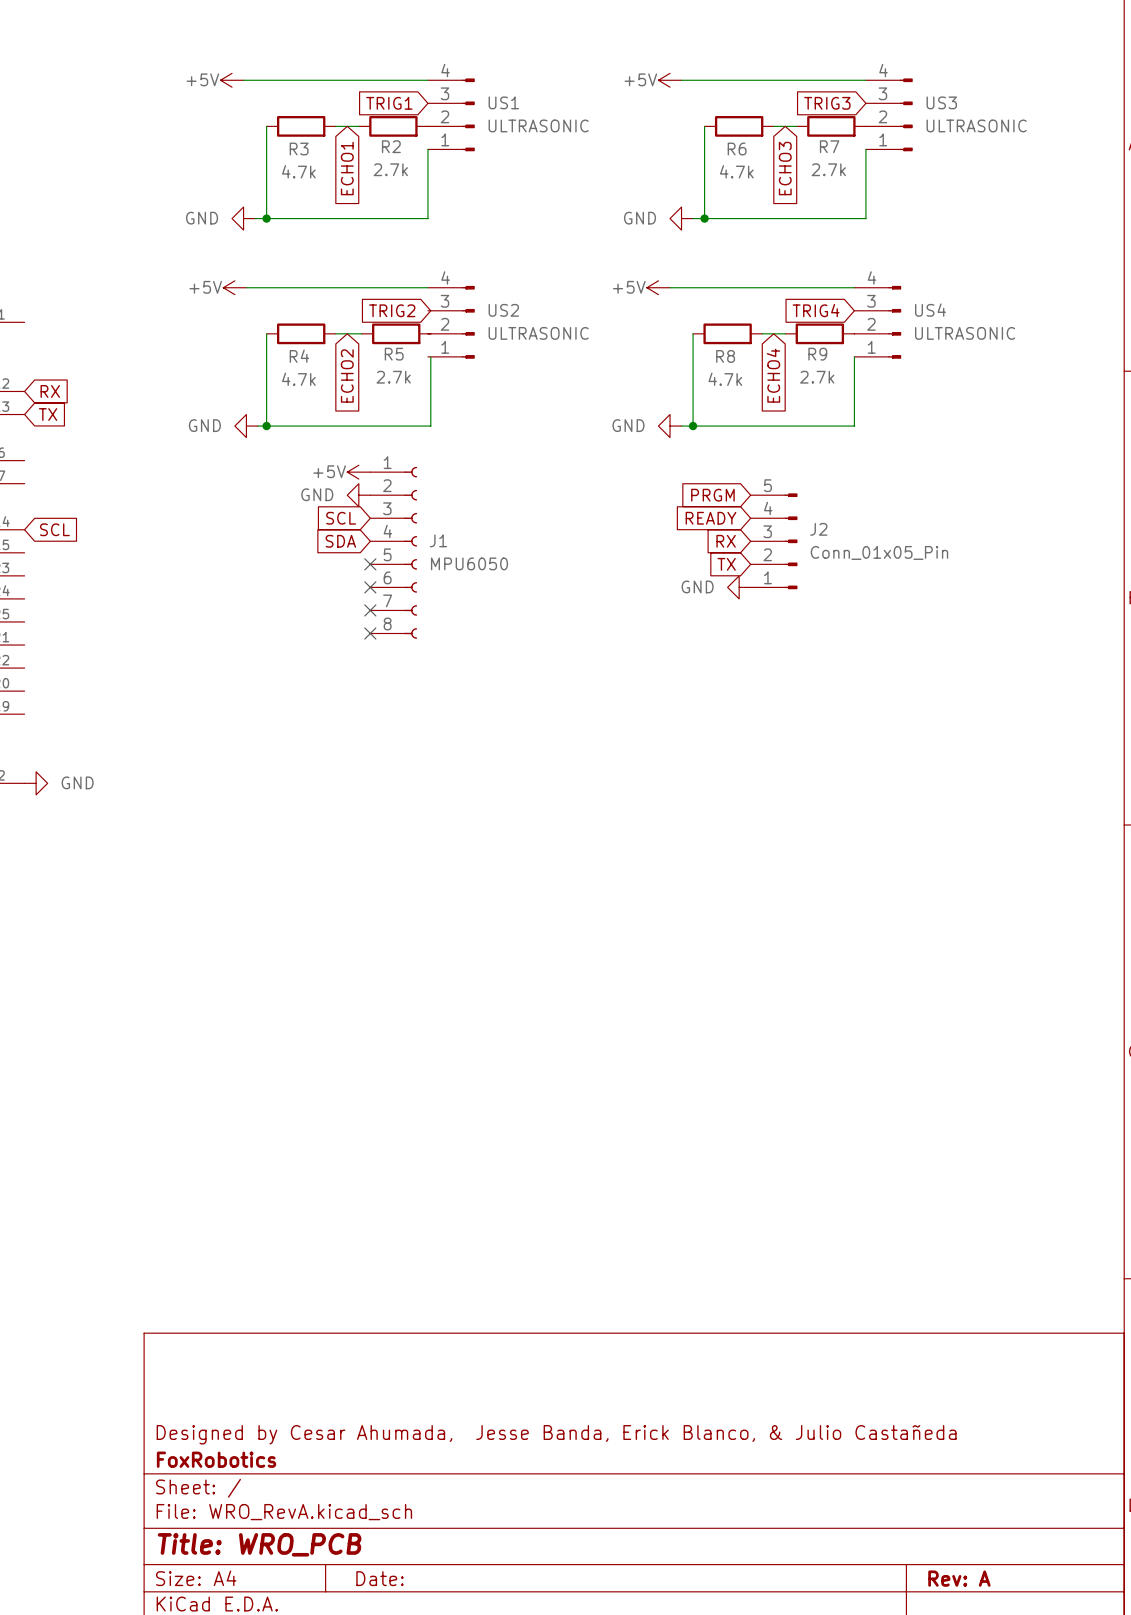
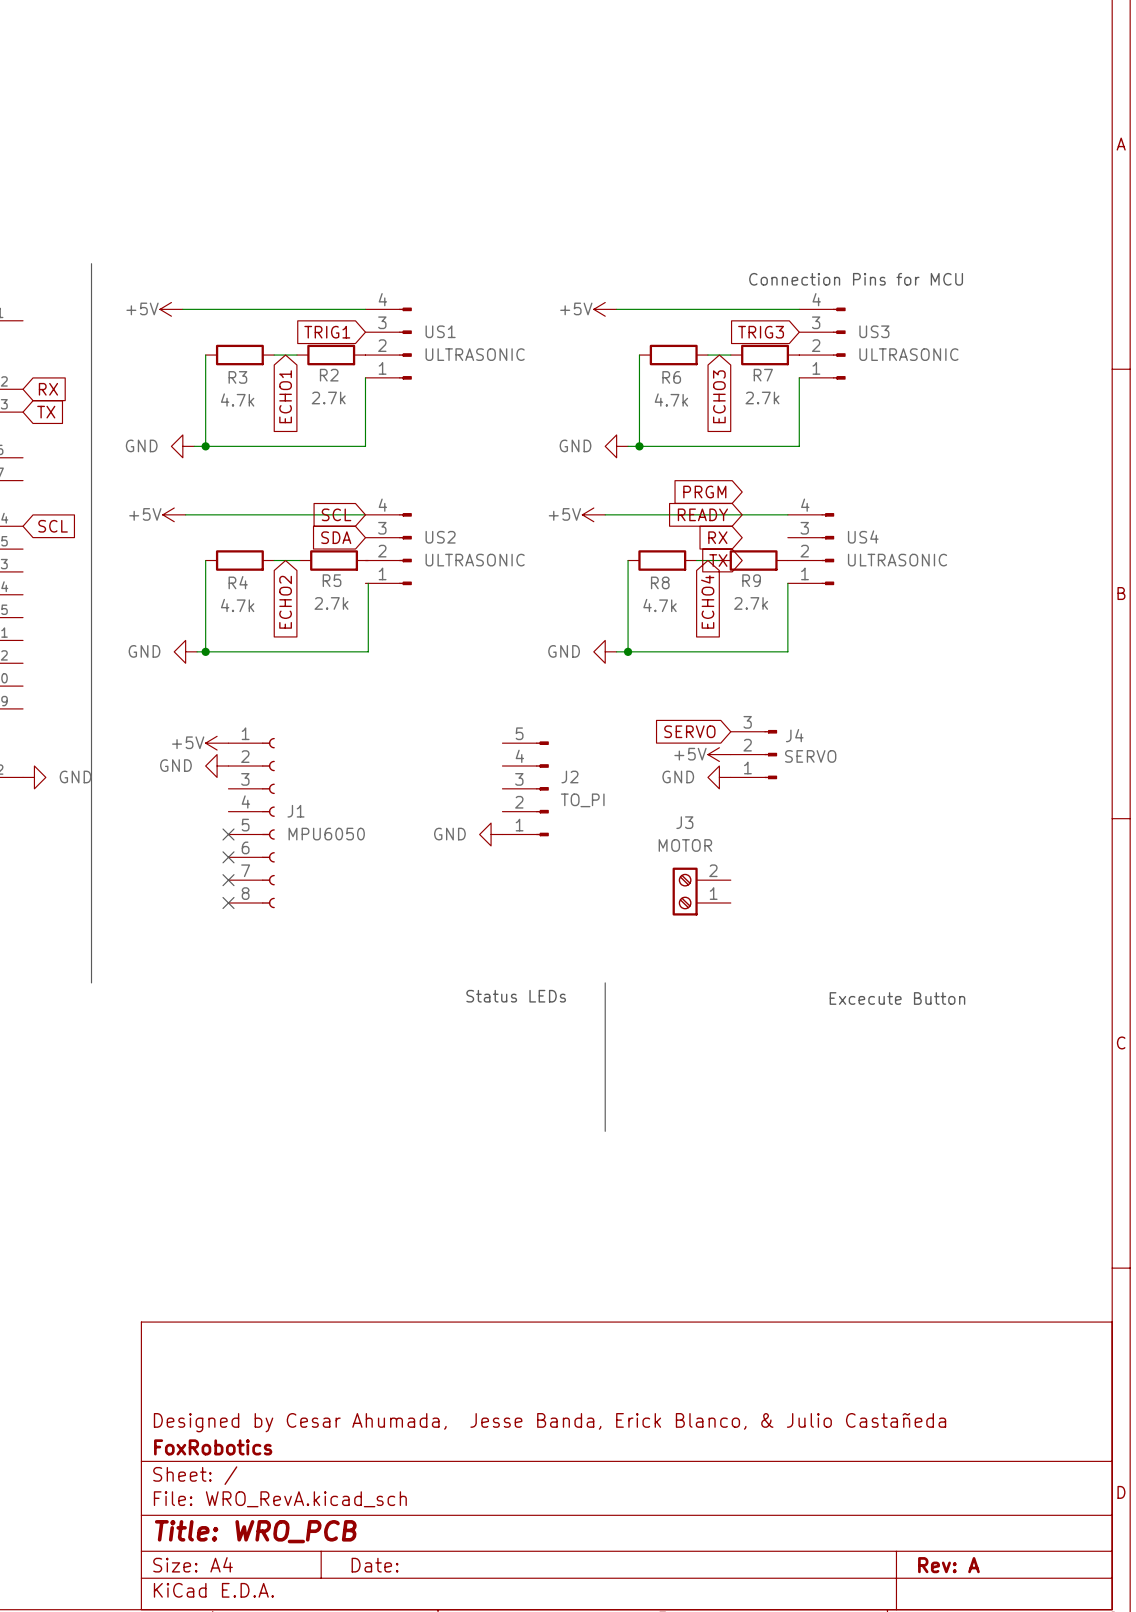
power symbol: +5V (232, 80) -> none
wire: (243, 80) (427, 80) -> none
power symbol: +5V (670, 80) -> none
wire: (681, 80) (865, 80) -> none
global label: TRIG1 (389, 103) -> none
global label: TRIG3 (827, 103) -> none
US1 position: (451, 114) -> (388, 343)
US3 position: (889, 114) -> (822, 343)
wire: (266, 126) (266, 218) -> none
R3 position: (301, 126) -> (239, 355)
wire: (335, 126) (358, 126) -> none
R2 position: (393, 126) -> (331, 355)
wire: (704, 126) (704, 218) -> none
R6 position: (739, 126) -> (673, 355)
wire: (773, 126) (796, 126) -> none
R7 position: (831, 126) -> (765, 355)
wire: (427, 149) (427, 218) (255, 218) -> none
wire: (865, 149) (865, 218) (693, 218) -> none
global label: ECHO1 (347, 168) -> none
global label: ECHO3 (785, 168) -> none
power symbol: GND (243, 218) -> none
junction: (266, 218) -> none
power symbol: GND (681, 218) -> none
junction: (704, 218) -> none
line: none -> (91, 263) (91, 982)
text: none -> Connection Pins for MCU (856, 279)
power symbol position: +5V (234, 287) -> +5V (171, 309)
wire: (246, 287) (427, 287) -> none
power symbol position: +5V (658, 287) -> +5V (605, 309)
wire: (670, 287) (854, 287) -> (616, 309) (799, 309)
wire: none -> (182, 309) (365, 309)
global label: TRIG2 (392, 310) -> TRIG1 (327, 332)
global label: TRIG4 (816, 310) -> TRIG3 (761, 332)
US2 position: (451, 322) -> (388, 549)
US4 position: (877, 322) -> (811, 549)
wire: (266, 333) (266, 426) -> (205, 355) (205, 446)
R4 position: (301, 333) -> (239, 560)
wire: (335, 333) (361, 333) -> none
R5 position: (396, 333) -> (334, 560)
wire: (693, 333) (693, 426) -> (639, 355) (639, 446)
R8 position: (727, 333) -> (662, 560)
wire: (762, 333) (785, 333) -> (707, 355) (730, 355)
R9 position: (819, 333) -> (753, 560)
wire: none -> (274, 355) (296, 355)
wire: (430, 356) (430, 426) (257, 426) -> (365, 377) (365, 446) (194, 446)
wire: (854, 356) (854, 426) (681, 426) -> (799, 377) (799, 446) (628, 446)
global label: ECHO2 (347, 375) -> none
global label: ECHO4 (773, 375) -> none
global label: none -> ECHO1 (285, 396)
global label: none -> ECHO3 (719, 396)
power symbol position: GND (246, 426) -> GND (182, 446)
junction: (266, 426) -> none
power symbol position: GND (670, 426) -> GND (616, 446)
junction position: (693, 426) -> (639, 446)
junction: none -> (205, 446)
power symbol: +5V (358, 472) -> none
power symbol: GND (358, 495) -> none
power symbol: none -> +5V (174, 514)
wire: none -> (185, 514) (365, 514)
power symbol: none -> +5V (593, 514)
wire: none -> (605, 514) (787, 514)
J2 position: (774, 541) -> (525, 788)
J1: MPU6050 (393, 552) -> none
J2 value: Conn_01x05_Pin (879, 552) -> TO_PI (582, 800)
wire: none -> (205, 560) (205, 651)
wire: none -> (274, 560) (299, 560)
no-connect mark: (370, 564) -> none
wire: none -> (628, 560) (628, 651)
wire: none -> (696, 560) (719, 560)
no-connect mark: (370, 587) -> none
wire: none -> (368, 583) (368, 651) (197, 651)
power symbol: GND (739, 587) -> none
wire: none -> (787, 583) (787, 651) (616, 651)
global label: none -> ECHO2 (285, 602)
global label: none -> ECHO4 (707, 601)
no-connect mark: (370, 610) -> none
no-connect mark: (370, 633) -> none
power symbol: none -> GND (185, 651)
junction: none -> (205, 651)
power symbol: none -> GND (605, 651)
junction: none -> (628, 651)
global label: none -> SERVO (689, 731)
power symbol: none -> +5V (217, 743)
power symbol: none -> +5V (719, 754)
J4: none -> SERVO (753, 754)
power symbol: none -> GND (217, 766)
power symbol: none -> GND (719, 777)
J1: none -> MPU6050 (251, 823)
no-connect mark: none -> (228, 834)
power symbol: none -> GND (491, 834)
no-connect mark: none -> (228, 857)
no-connect mark: none -> (228, 880)
J3: none -> MOTOR (701, 891)
no-connect mark: none -> (228, 902)
line: none -> (605, 982) (605, 1131)
text: none -> Status LEDs (516, 996)
text: none -> Excecute Button (897, 998)

